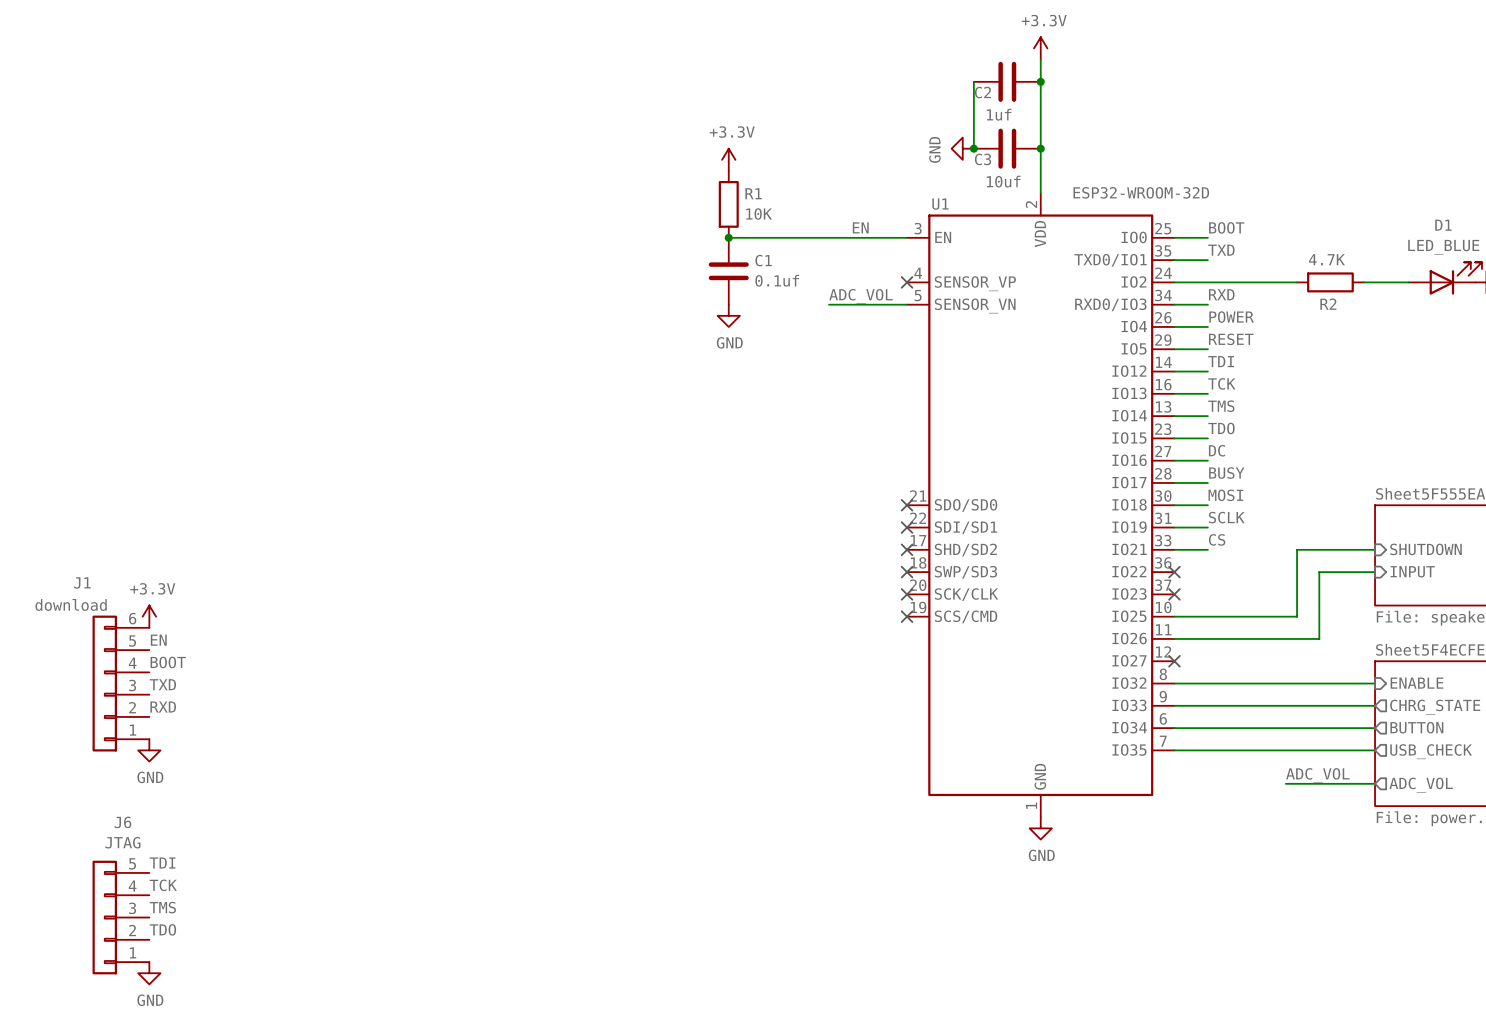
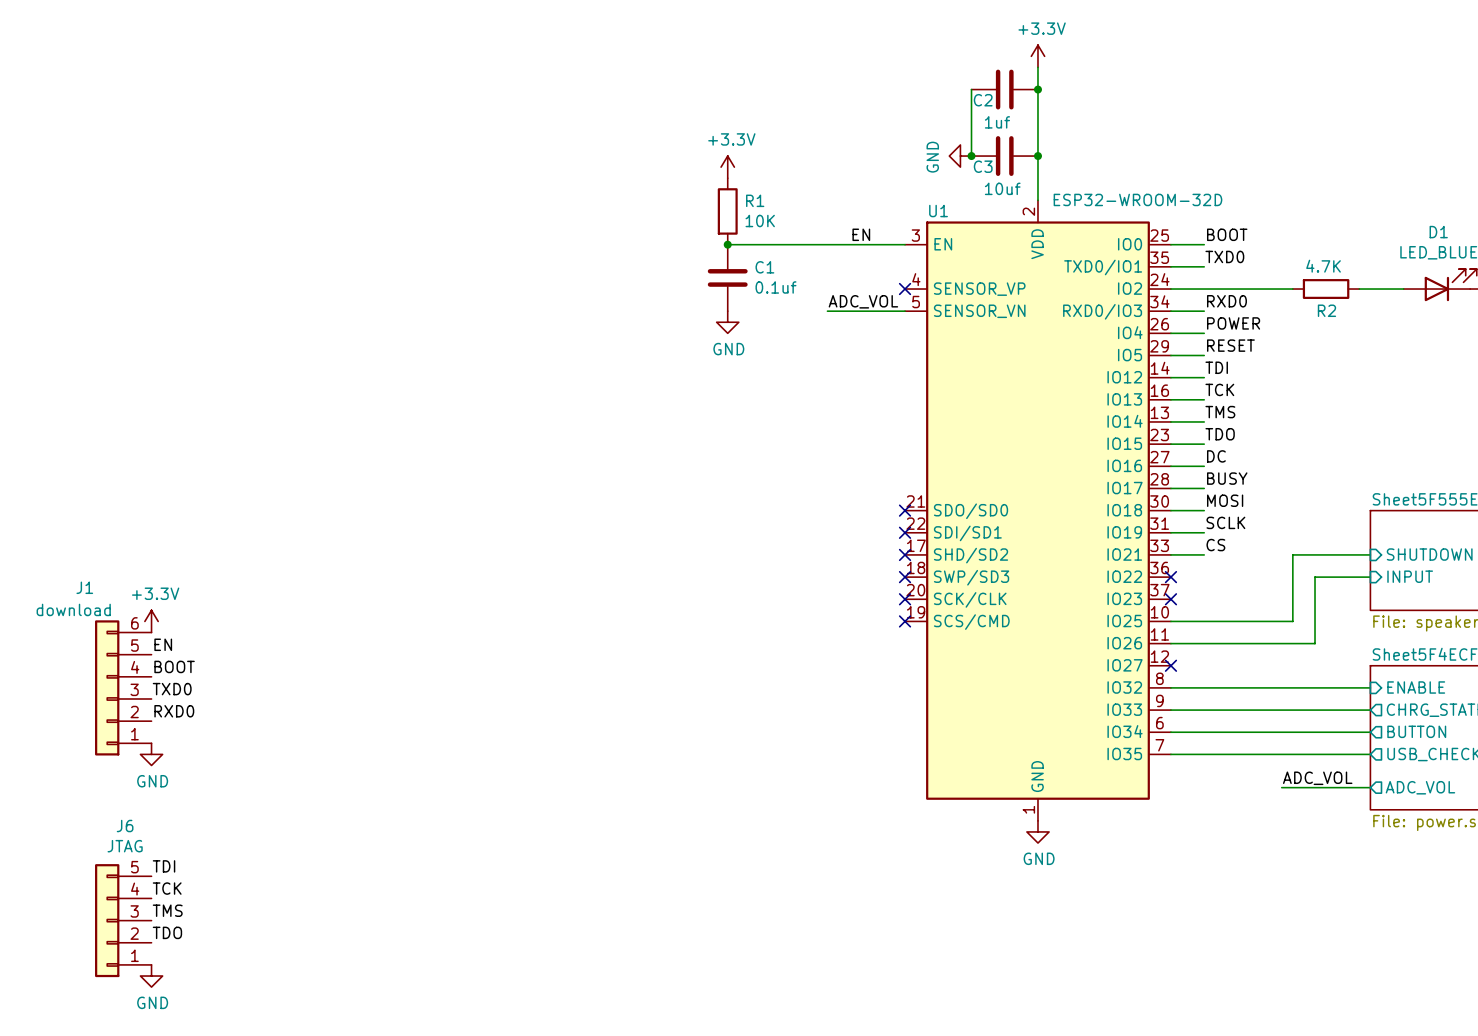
label: TXD (1221, 250) -> TXD0 (1224, 256)
label: RXD (1221, 294) -> RXD0 (1226, 301)
label: TXD (162, 684) -> TXD0 (172, 689)
label: RXD (163, 707) -> RXD0 (174, 711)

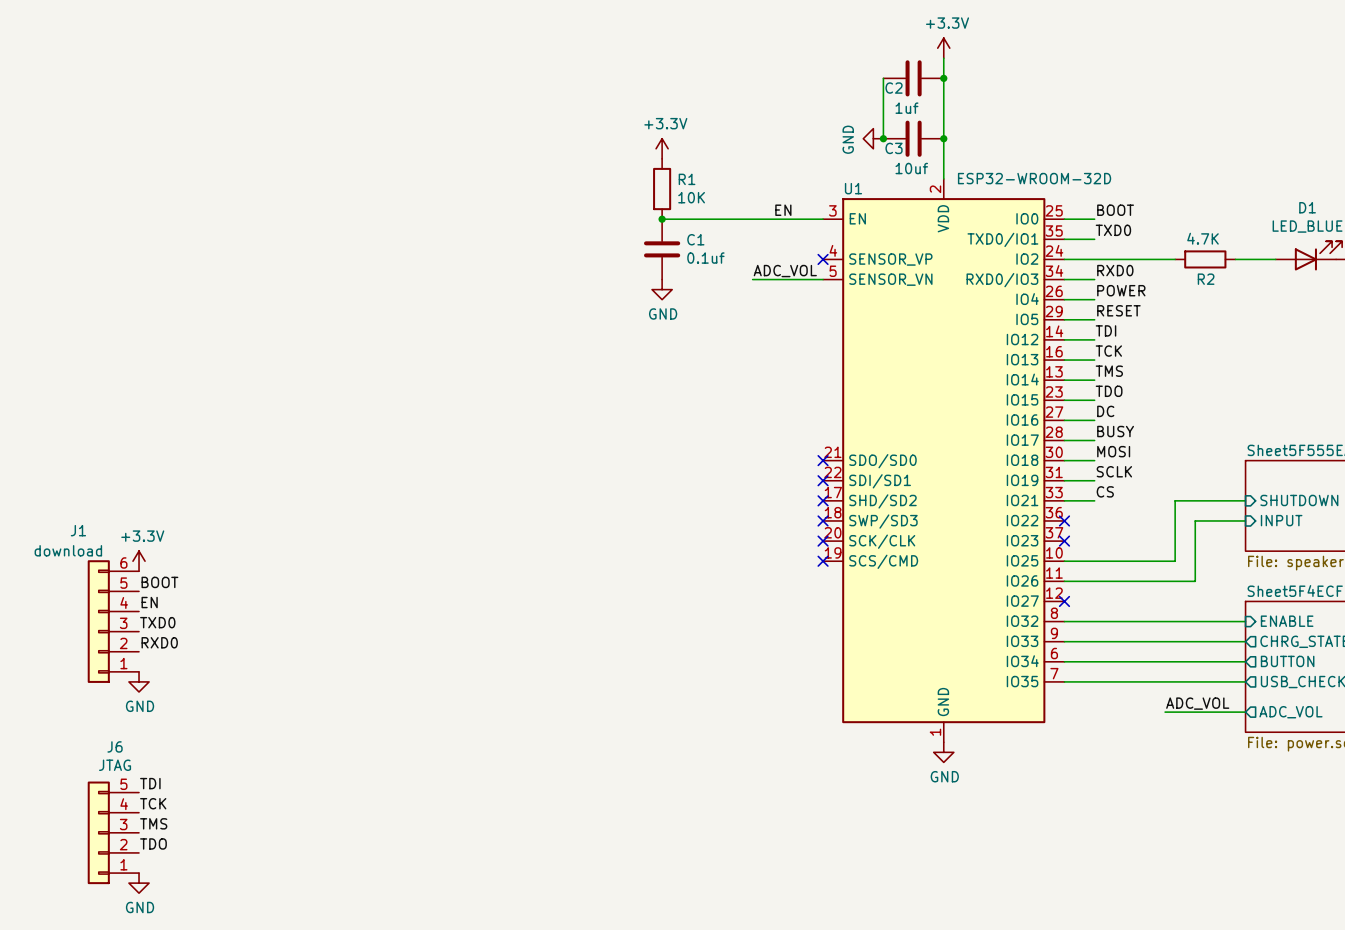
label: EN (163, 644) -> BOOT (159, 582)
label: BOOT (174, 666) -> EN (149, 602)

